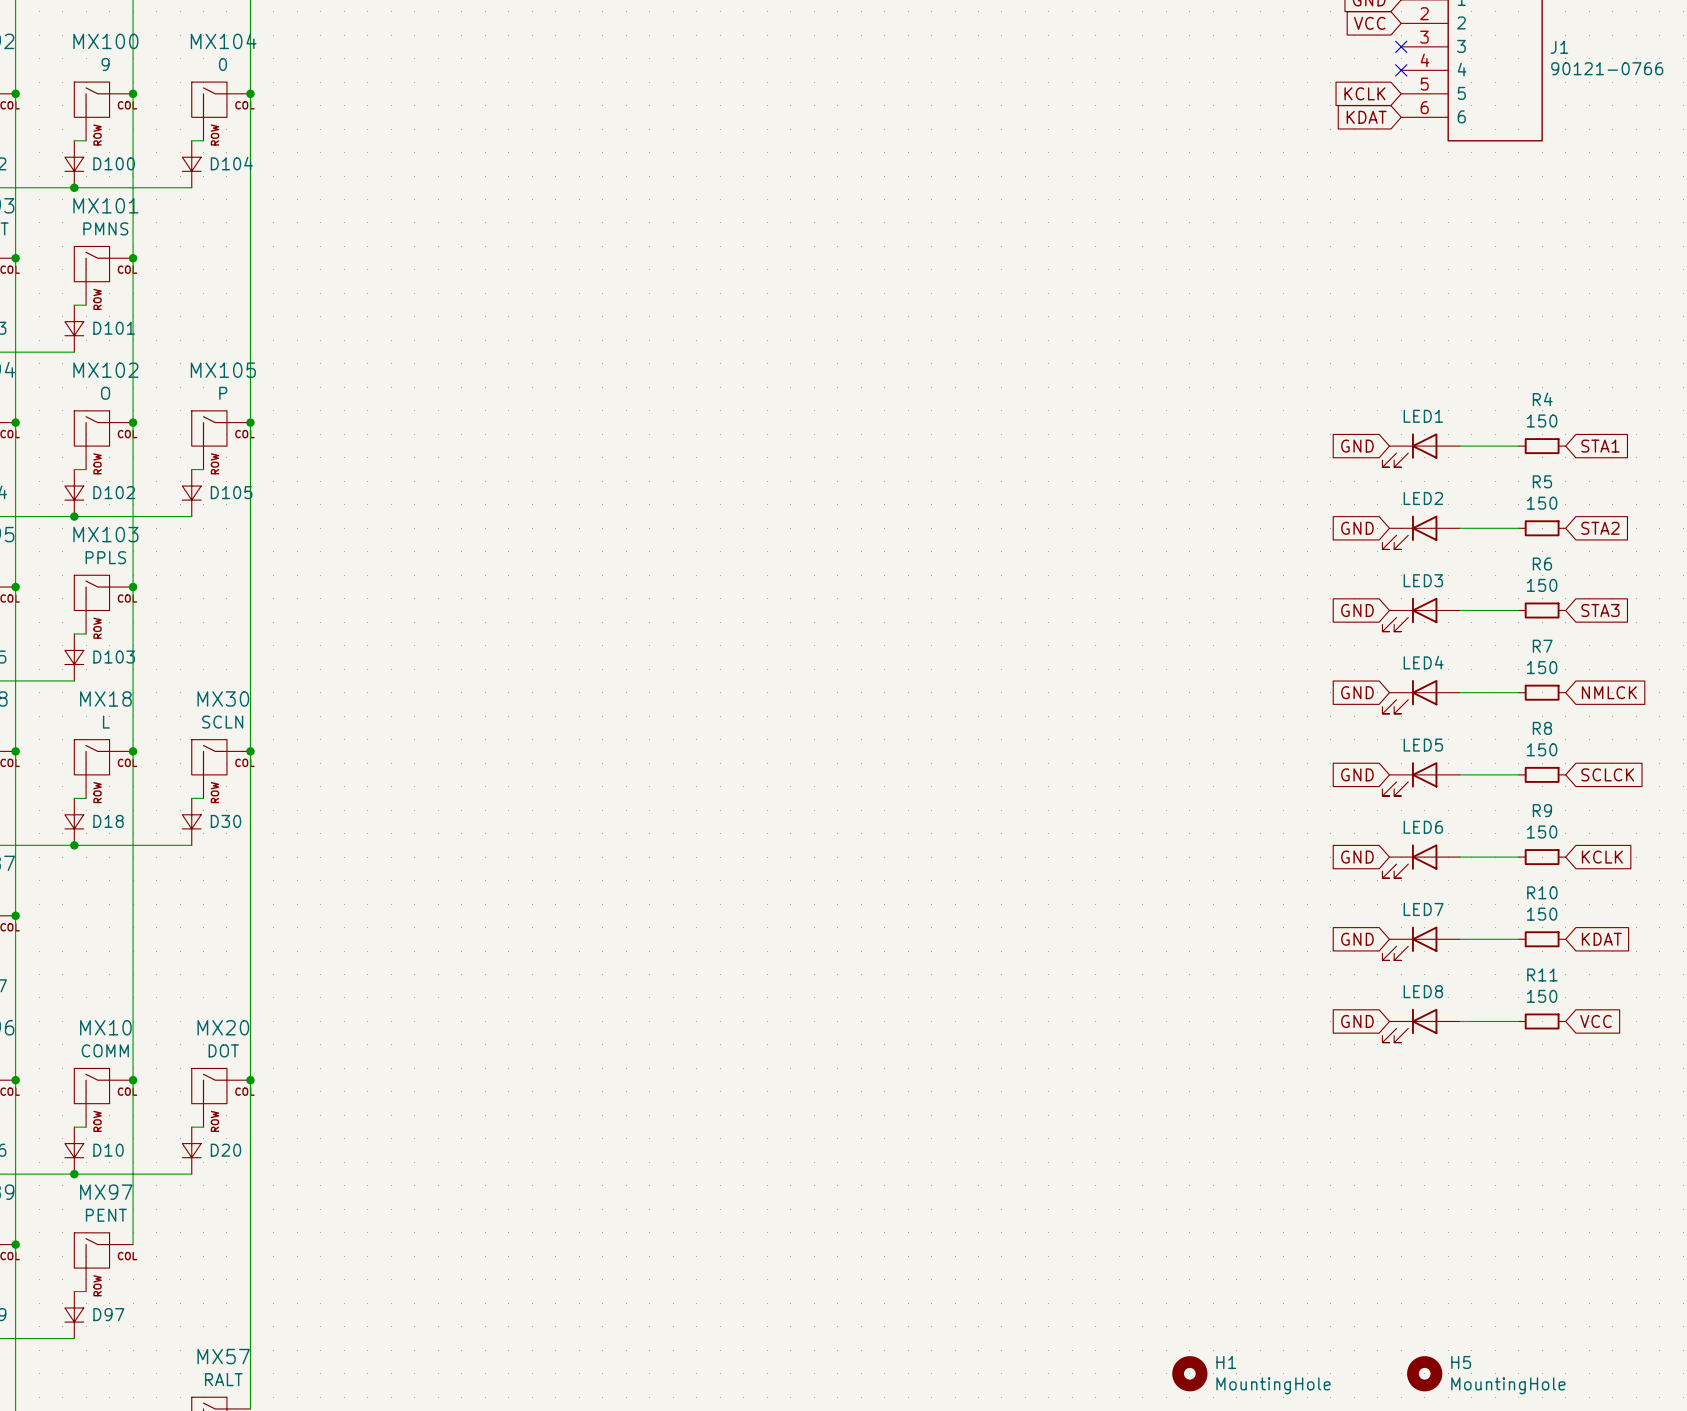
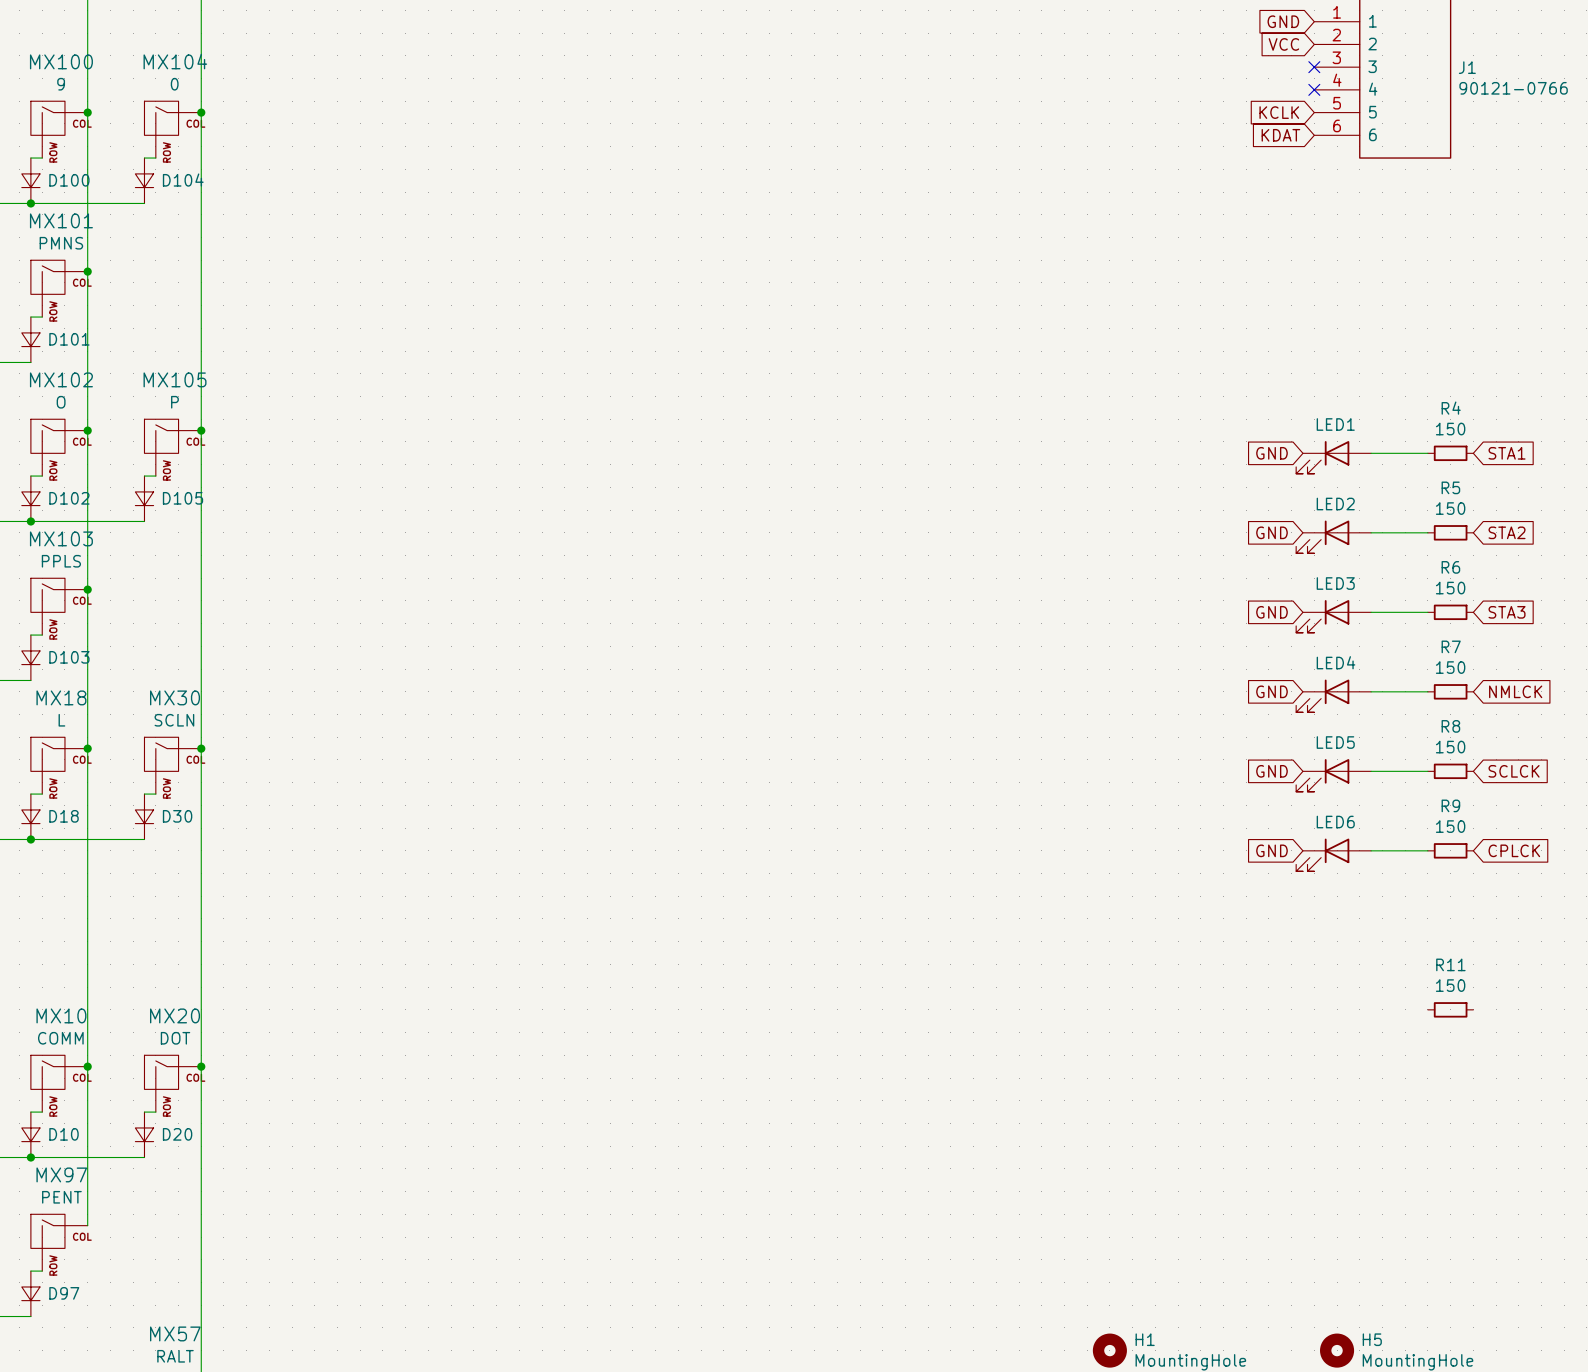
global label: KCLK (1602, 857) -> CPLCK (1514, 850)
global label: GND (1357, 939) -> none
wire: (1459, 939) (1518, 939) -> none
R10: 150 (1542, 939) -> none
global label: KDAT (1601, 939) -> none
LED7: (1421, 943) -> none
global label: GND (1357, 1021) -> none
wire: (1459, 1021) (1518, 1021) -> none
global label: VCC (1595, 1021) -> none
LED8: (1421, 1025) -> none

